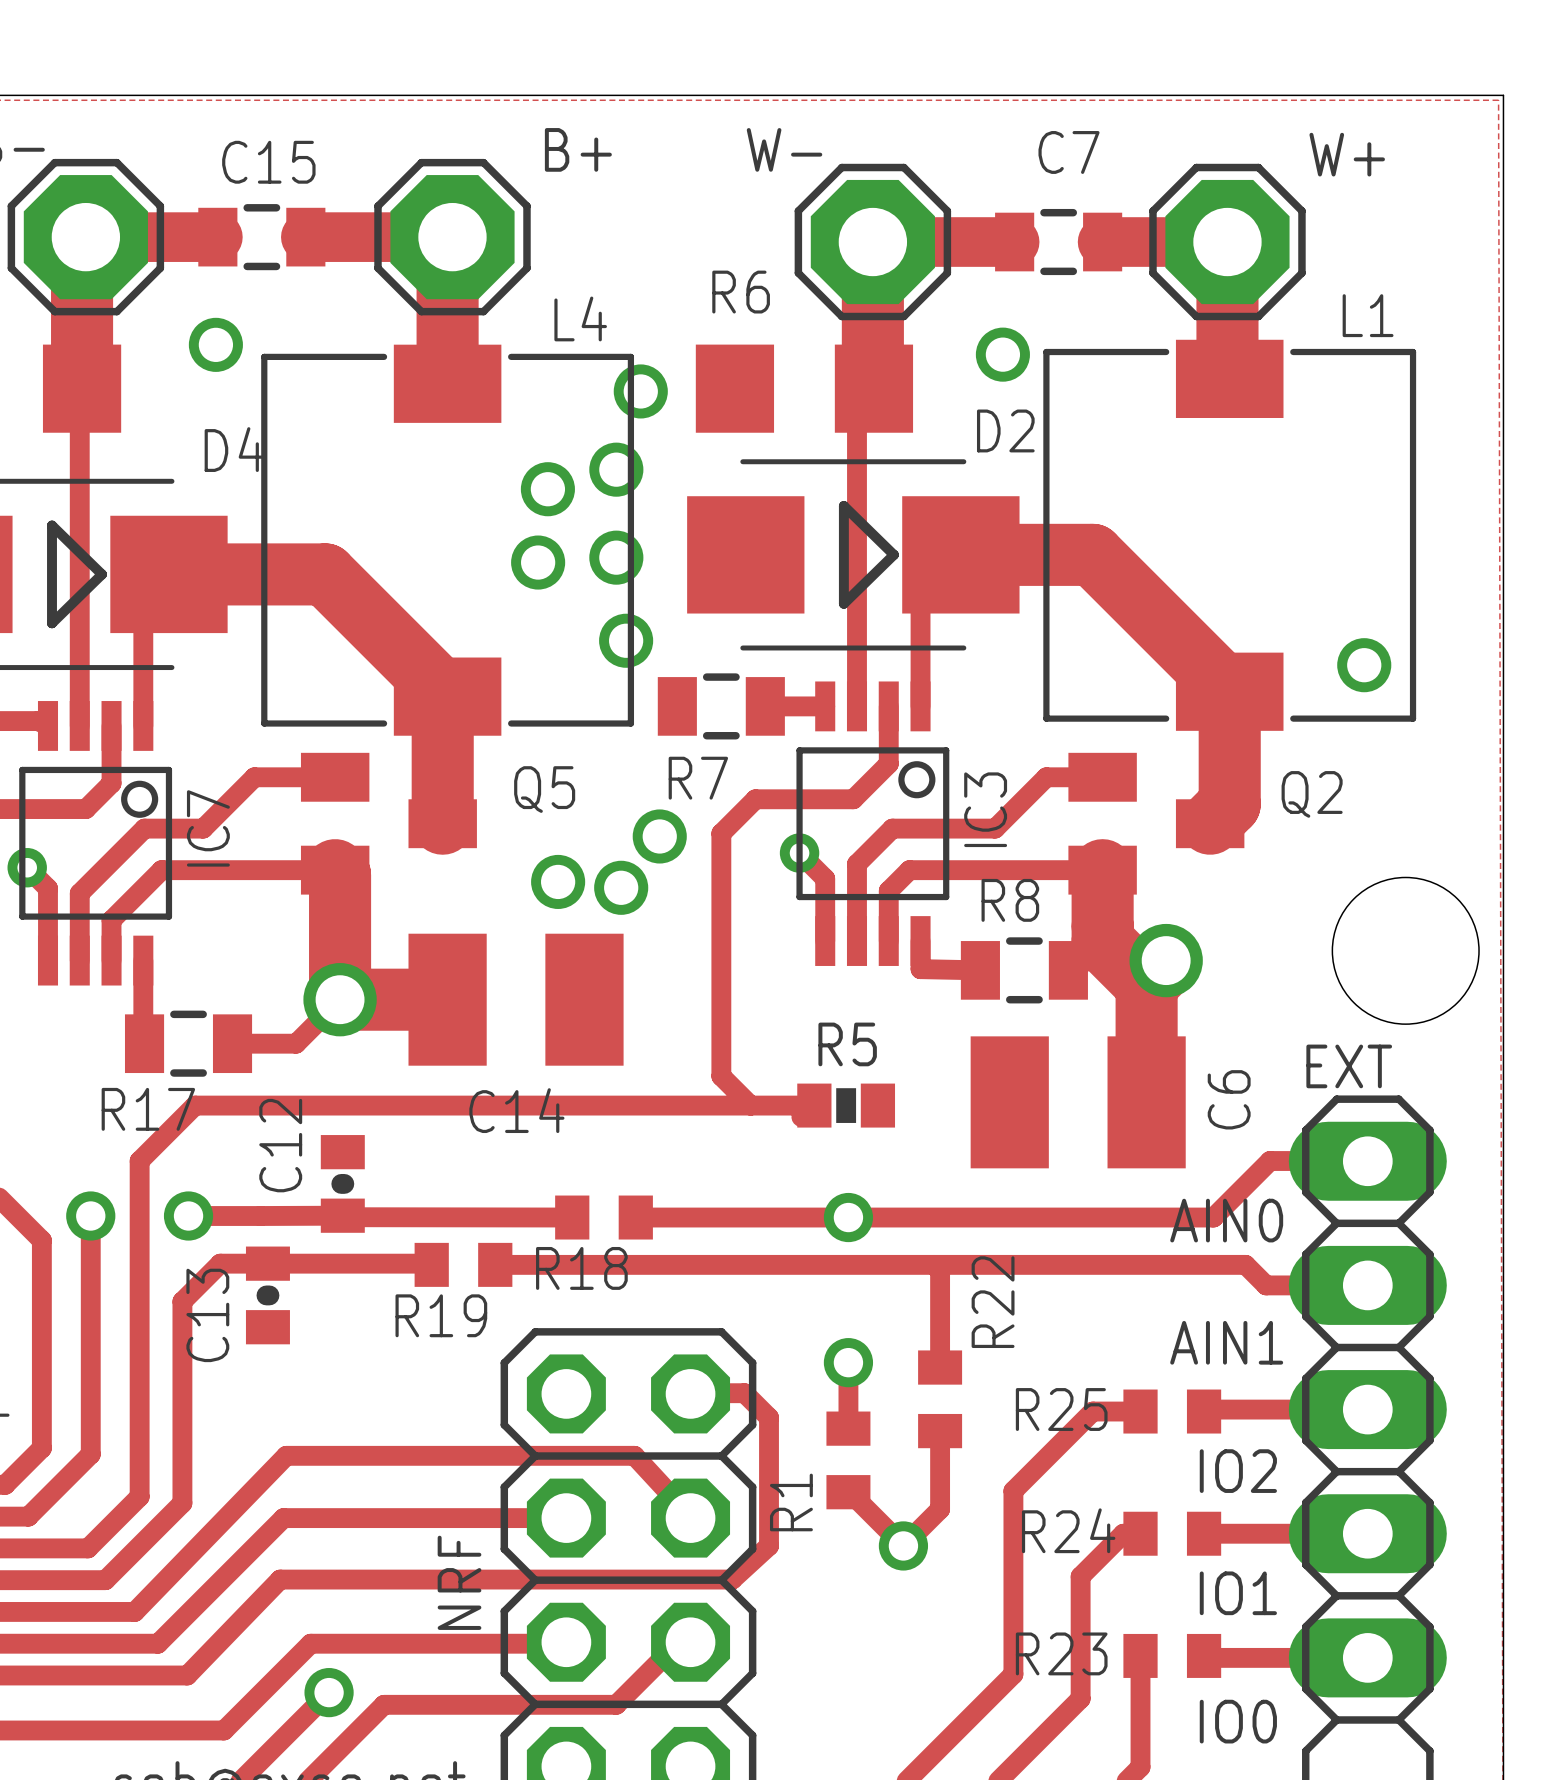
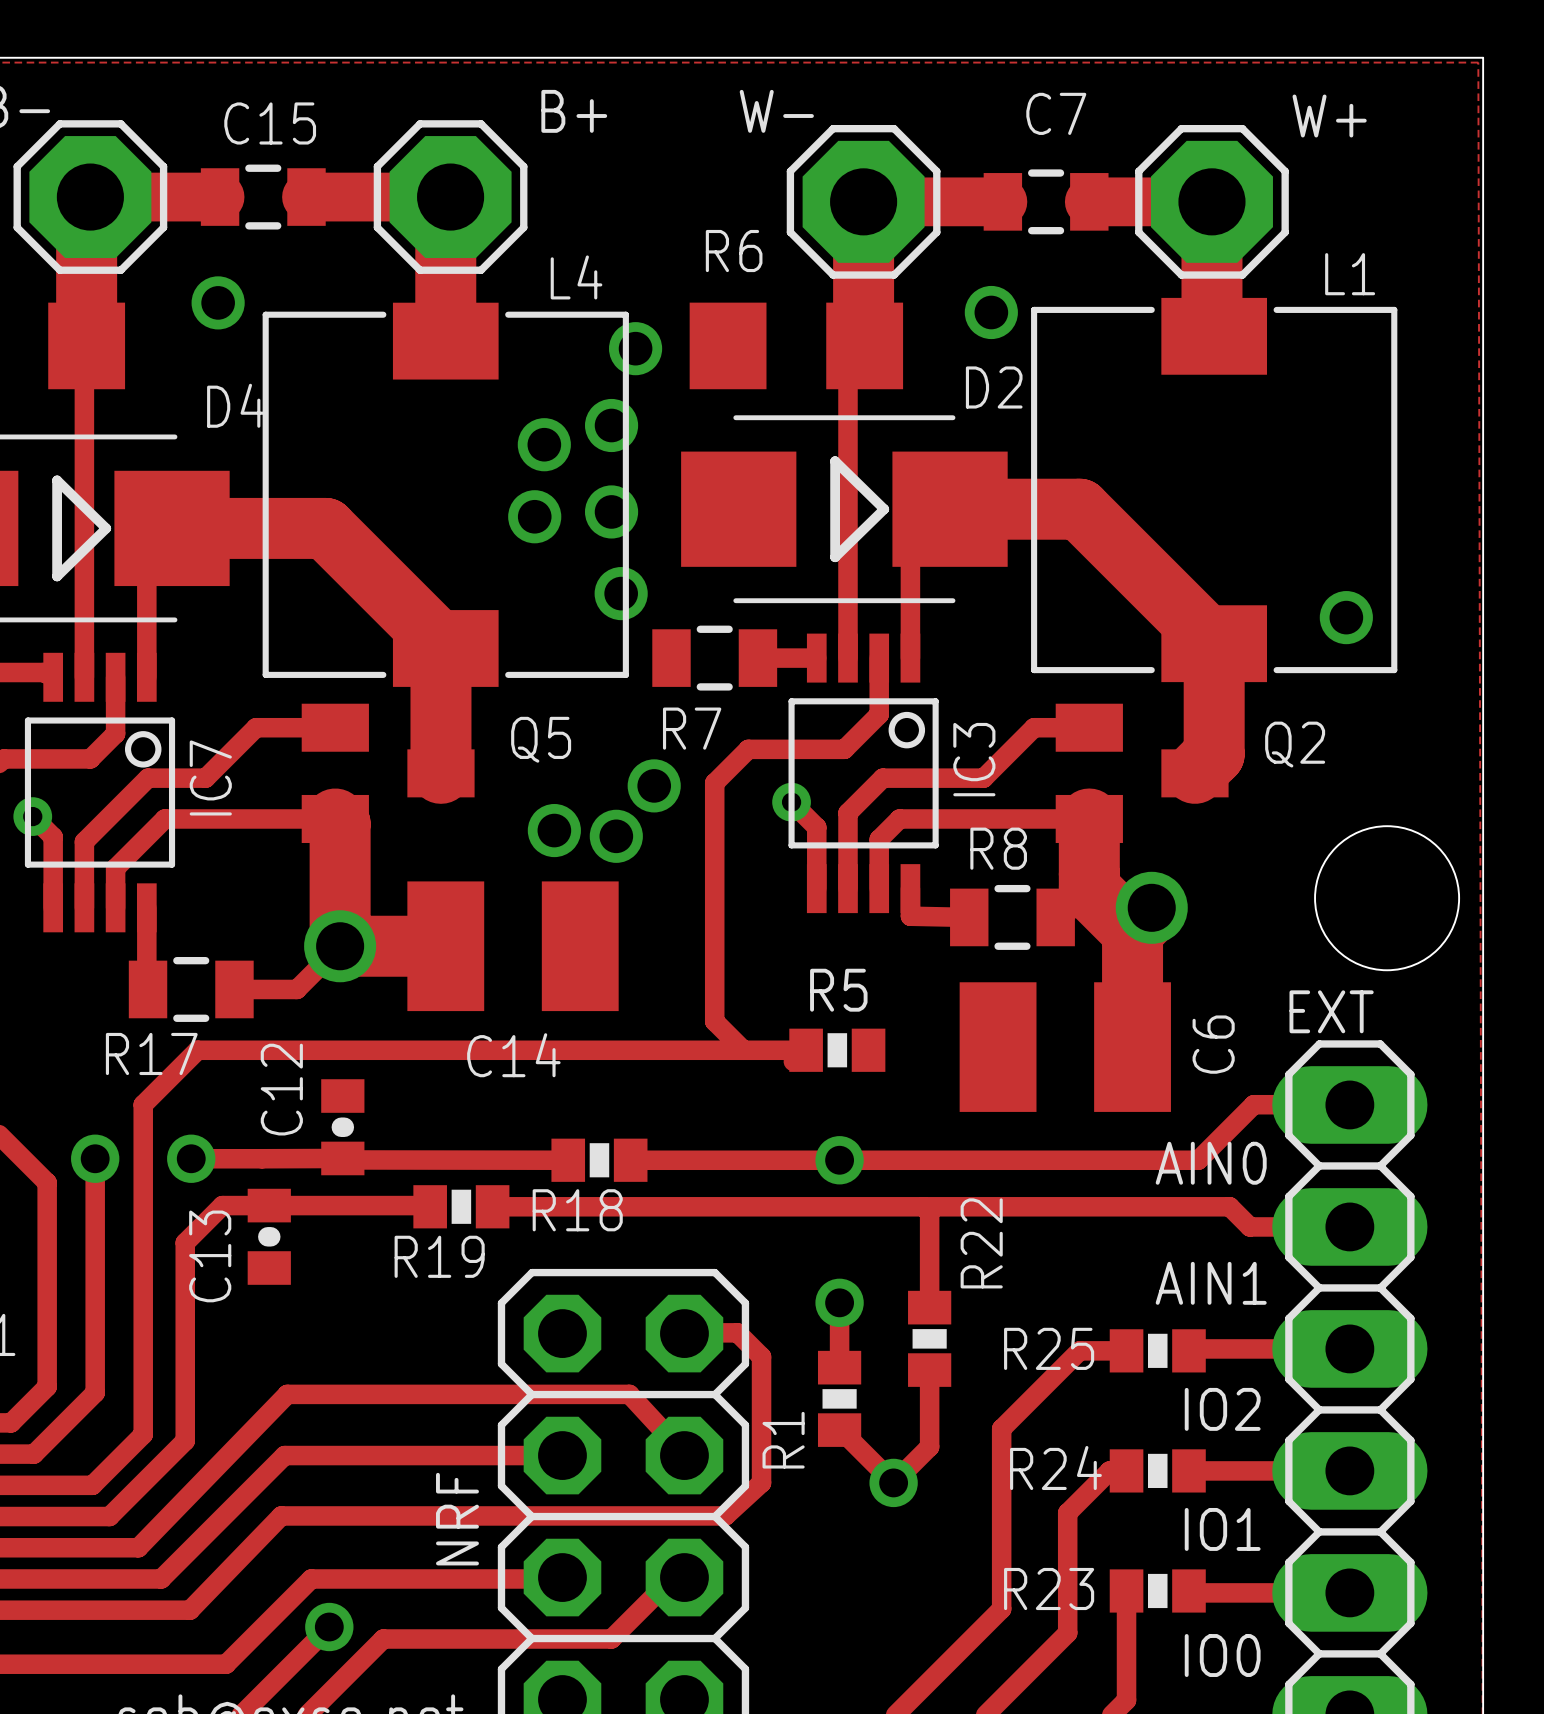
R18 footprint: [555, 1195, 653, 1240] -> [551, 1138, 648, 1182]
R19 footprint: [414, 1242, 513, 1287] -> [413, 1185, 510, 1229]
R22 footprint: [918, 1350, 963, 1449] -> [908, 1290, 952, 1387]
R25 footprint: [1123, 1389, 1222, 1434] -> [1109, 1329, 1206, 1373]
R1 footprint: [826, 1411, 871, 1510] -> [817, 1350, 862, 1447]
R24 footprint: [1123, 1511, 1222, 1556] -> [1109, 1449, 1206, 1493]
R23 footprint: [1123, 1633, 1222, 1678] -> [1109, 1569, 1206, 1613]

